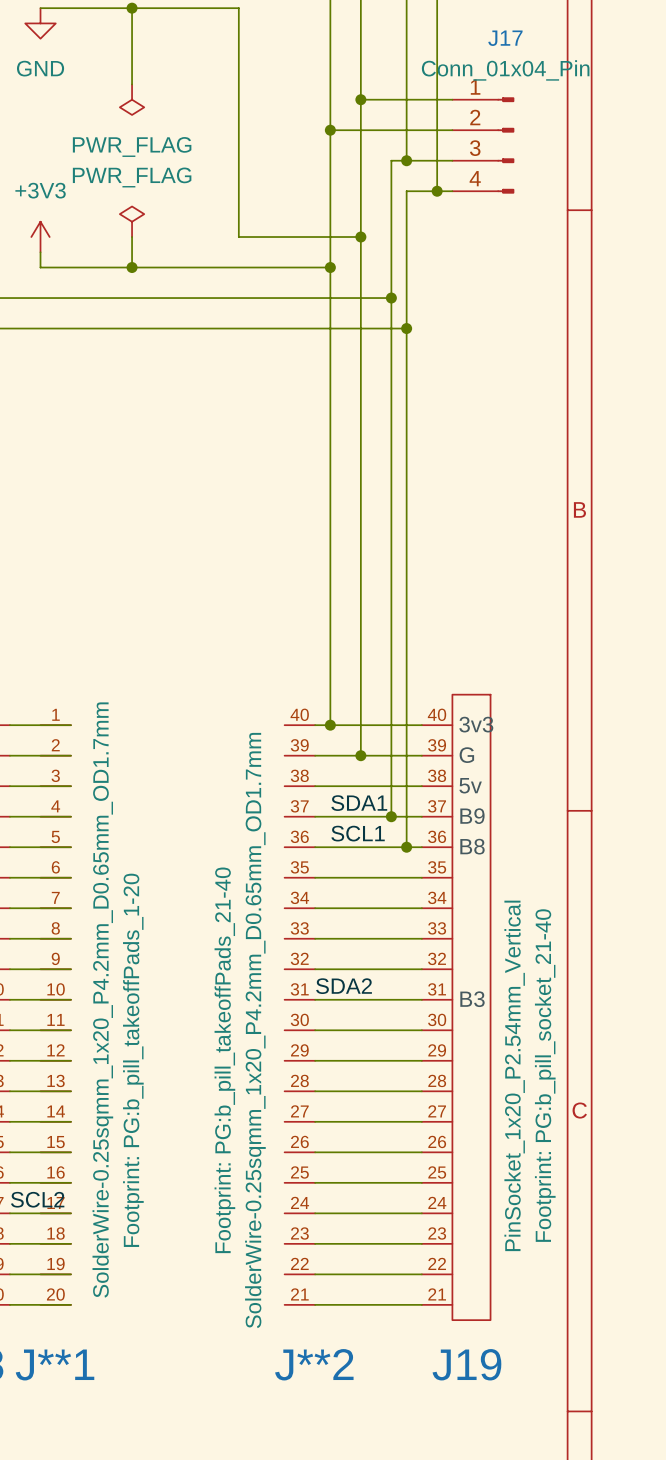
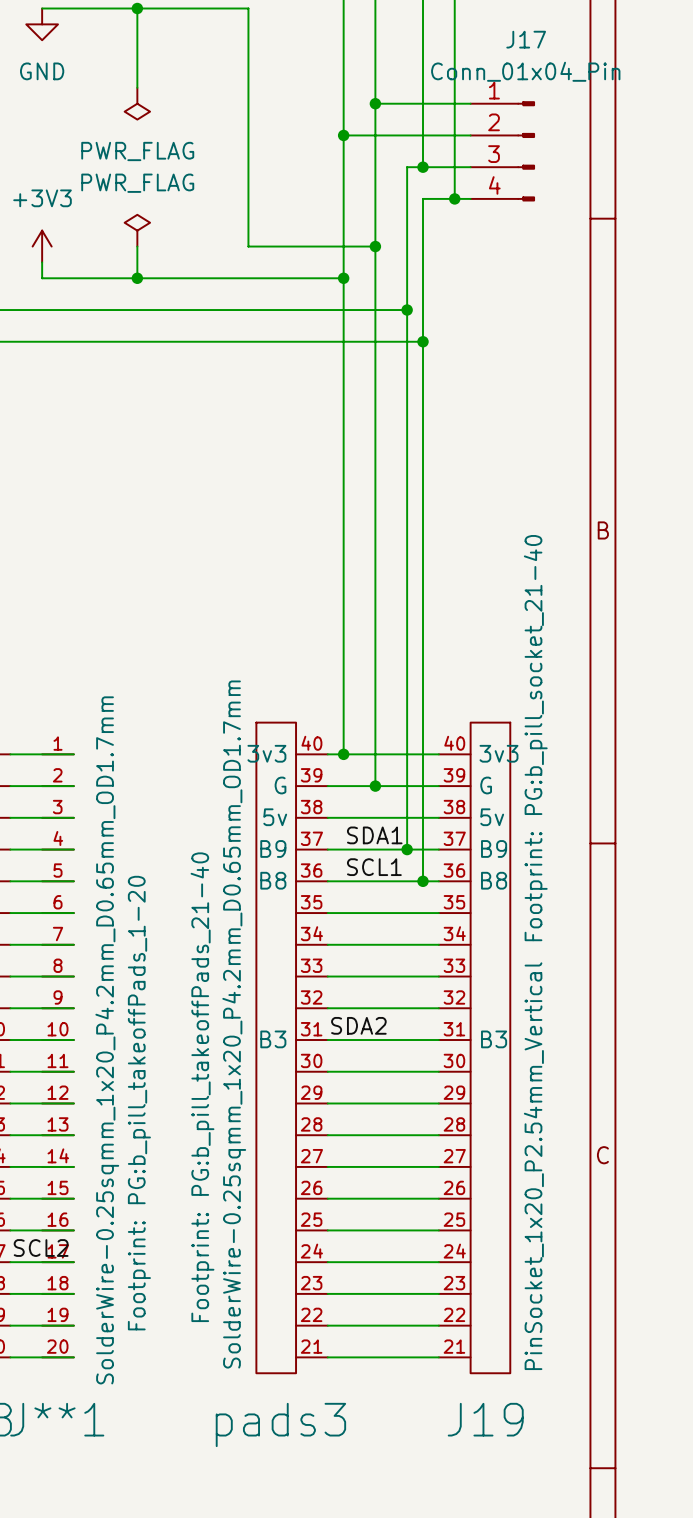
pads3: none -> SolderWire-0.25sqmm_1x20_P4.2mm_D0.65mm_OD1.7mm (224, 1047)
J**2: SolderWire-0.25sqmm_1x20_P4.2mm_D0.65mm_OD1.7mm (215, 1015) -> none
J19 value position: PinSocket_1x20_P2.54mm_Vertical (514, 1075) -> PinSocket_1x20_P2.54mm_Vertical (533, 1166)
J19 text position: Footprint: PG:b_pill_socket_21-40 (545, 1075) -> Footprint: PG:b_pill_socket_21-40 (535, 738)

